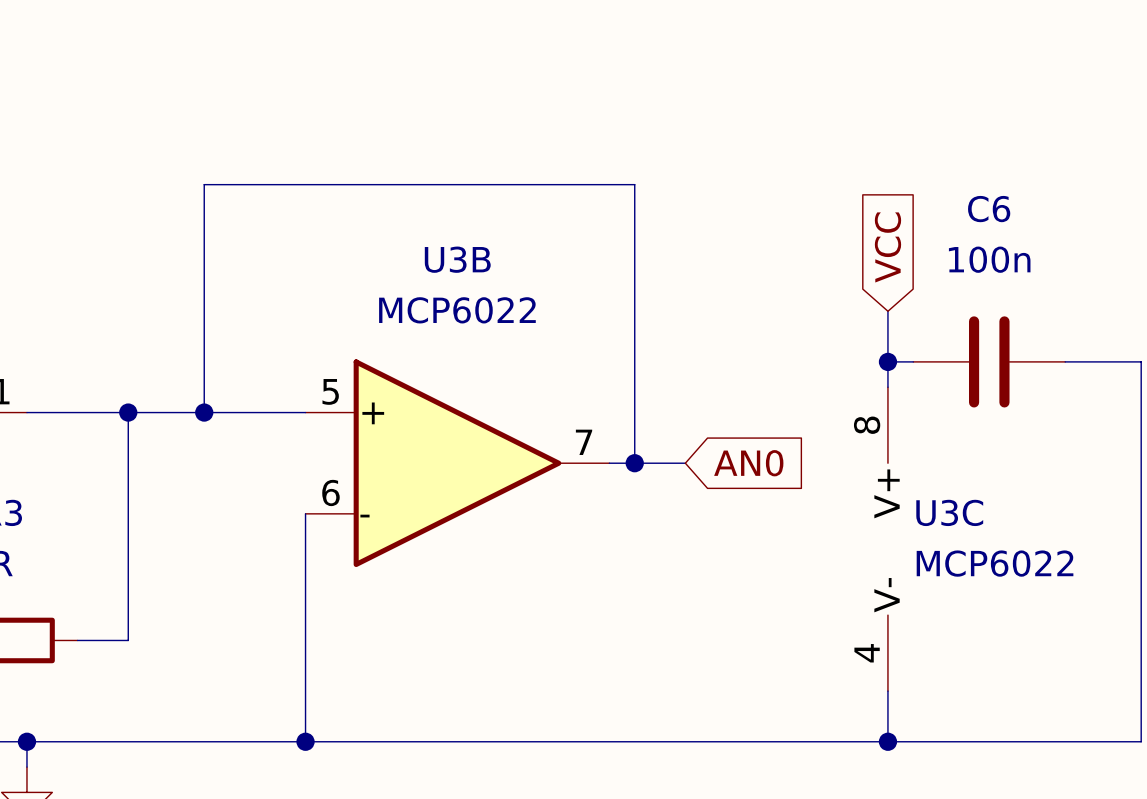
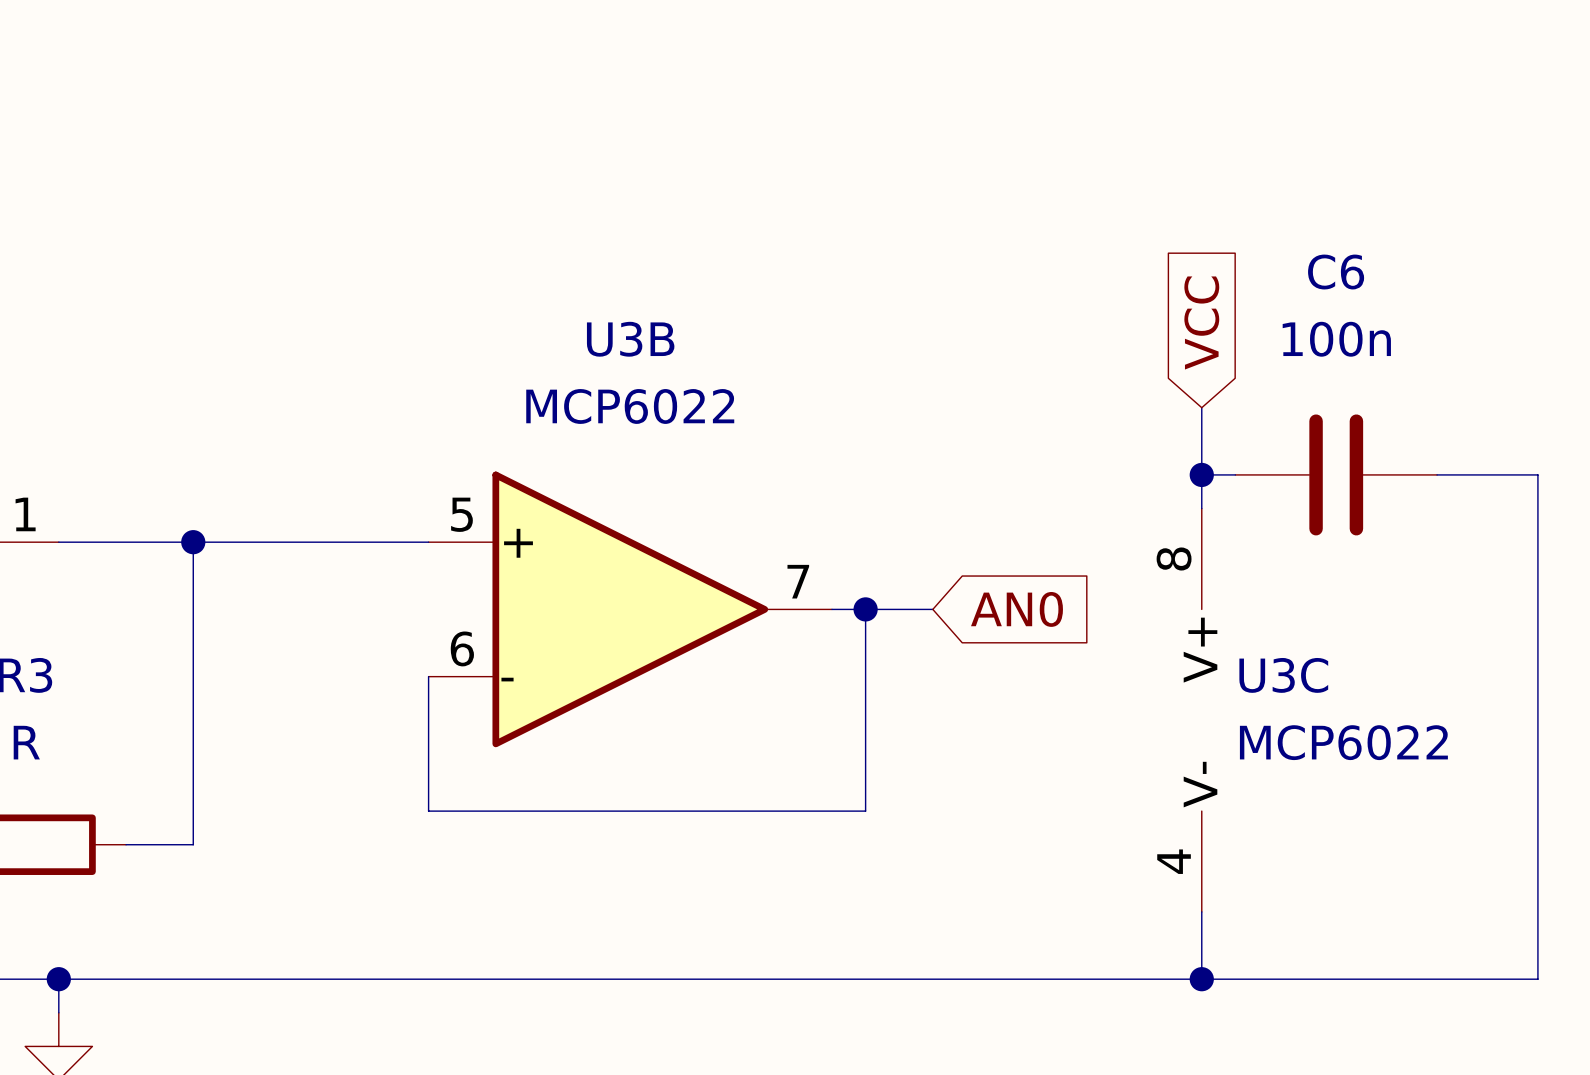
wire: (204, 412) (204, 184) (634, 184) (634, 463) -> (428, 811) (865, 811) (865, 609)
junction: (204, 412) -> none
wire: (305, 615) (305, 741) -> none
junction: (305, 741) -> none

